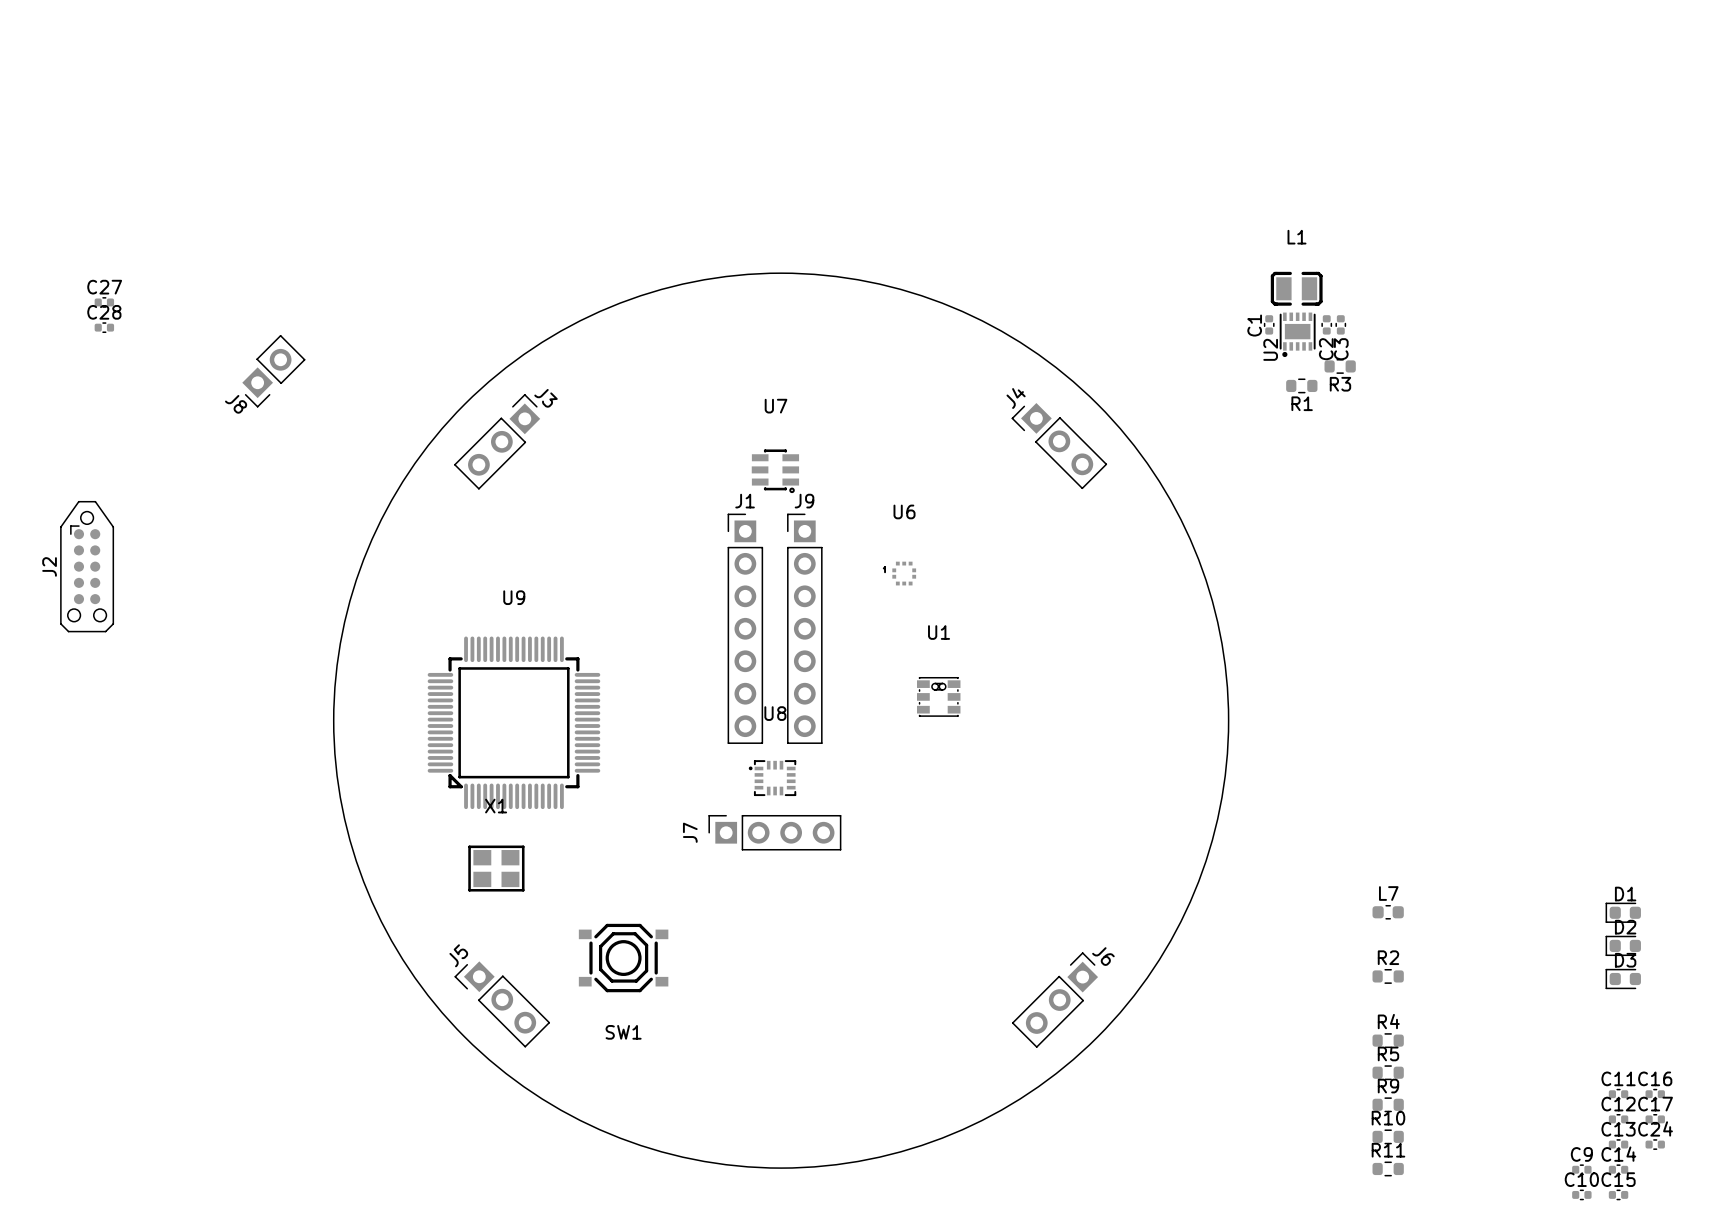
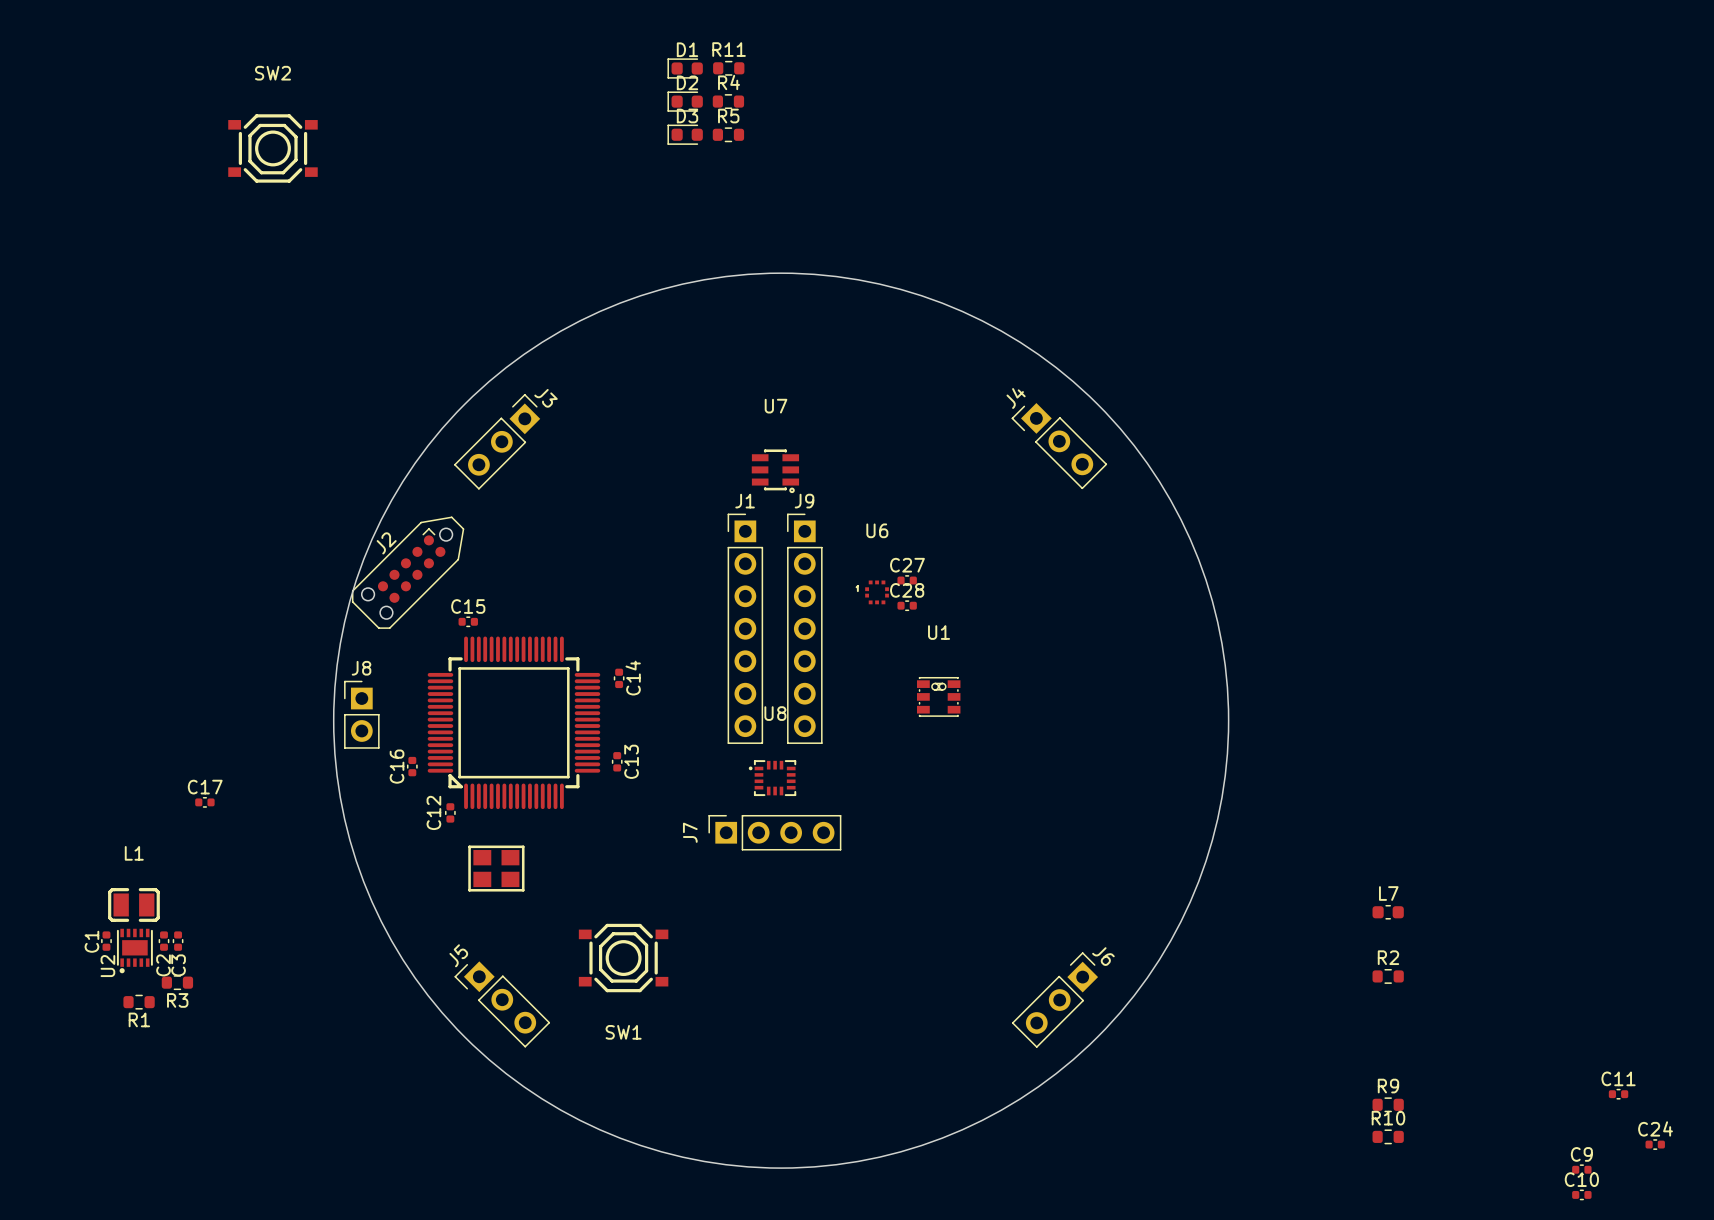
SW2: none -> (272, 148)
L1 position: (1296, 288) -> (133, 904)
C27 position: (104, 302) -> (907, 580)
C1 position: (1269, 324) -> (106, 941)
C2 position: (1326, 324) -> (164, 941)
C3 position: (1340, 324) -> (178, 941)
C28 position: (104, 327) -> (907, 605)
U2 position: (1297, 334) -> (134, 951)
R3 position: (1340, 366) -> (177, 982)
J8 rotation: 0° (273, 371) -> 135° clockwise (361, 714)
J8 position: (273, 371) -> (361, 714)
R1 position: (1301, 385) -> (139, 1002)
J2 rotation: 0° (87, 566) -> 45° clockwise (408, 572)
J2 position: (87, 566) -> (408, 572)
U6 position: (899, 573) -> (872, 592)
U9 name: U9 (514, 597) -> none
X1 name: X1 (496, 806) -> none
D1 position: (1623, 912) -> (685, 68)
D2 position: (1623, 945) -> (685, 101)
D3 position: (1623, 979) -> (685, 134)
R4 position: (1388, 1040) -> (728, 101)
R5 position: (1388, 1072) -> (728, 134)
C16 rotation: 0° (1655, 1094) -> 90° clockwise (412, 766)
C16 position: (1655, 1094) -> (412, 766)
C12 rotation: 0° (1618, 1119) -> 90° clockwise (450, 812)
C12 position: (1618, 1119) -> (450, 812)
C17 position: (1655, 1119) -> (204, 802)
C13 rotation: 0° (1618, 1144) -> 90° clockwise (617, 761)
C13 position: (1618, 1144) -> (617, 761)
R11 position: (1388, 1168) -> (728, 68)
C14 rotation: 0° (1618, 1169) -> 90° clockwise (619, 678)
C14 position: (1618, 1169) -> (619, 678)
C15 position: (1618, 1194) -> (468, 621)

